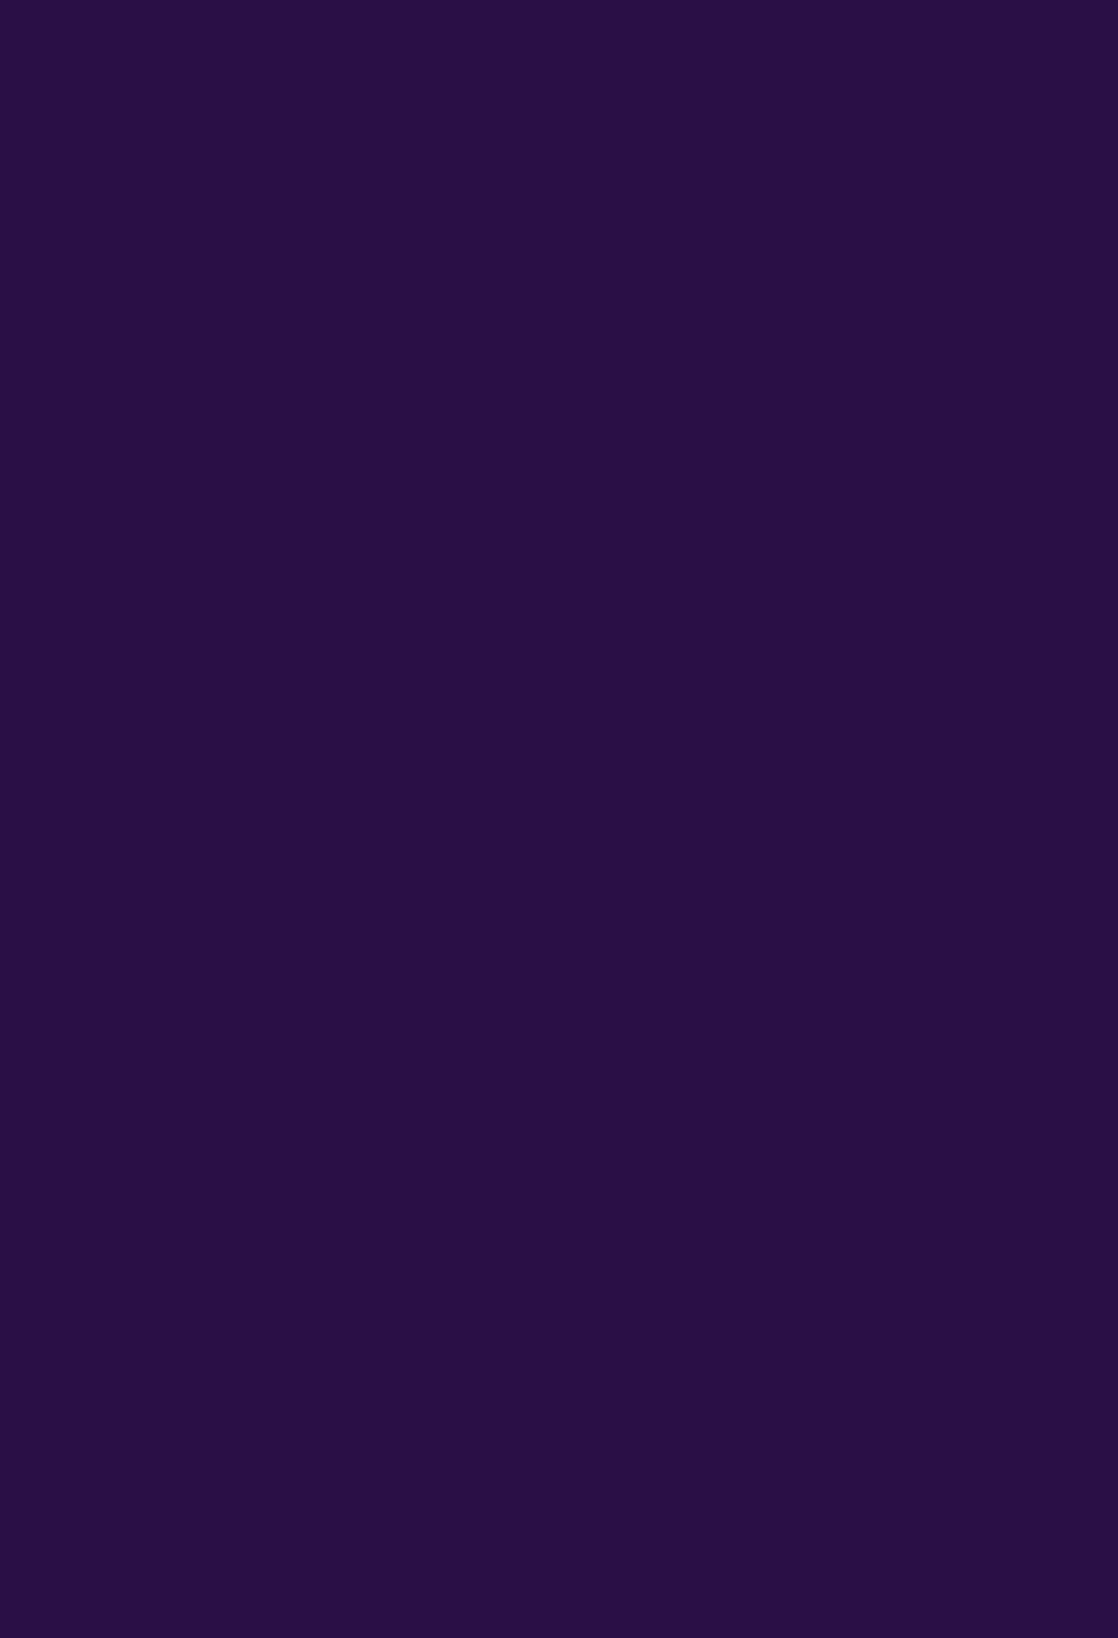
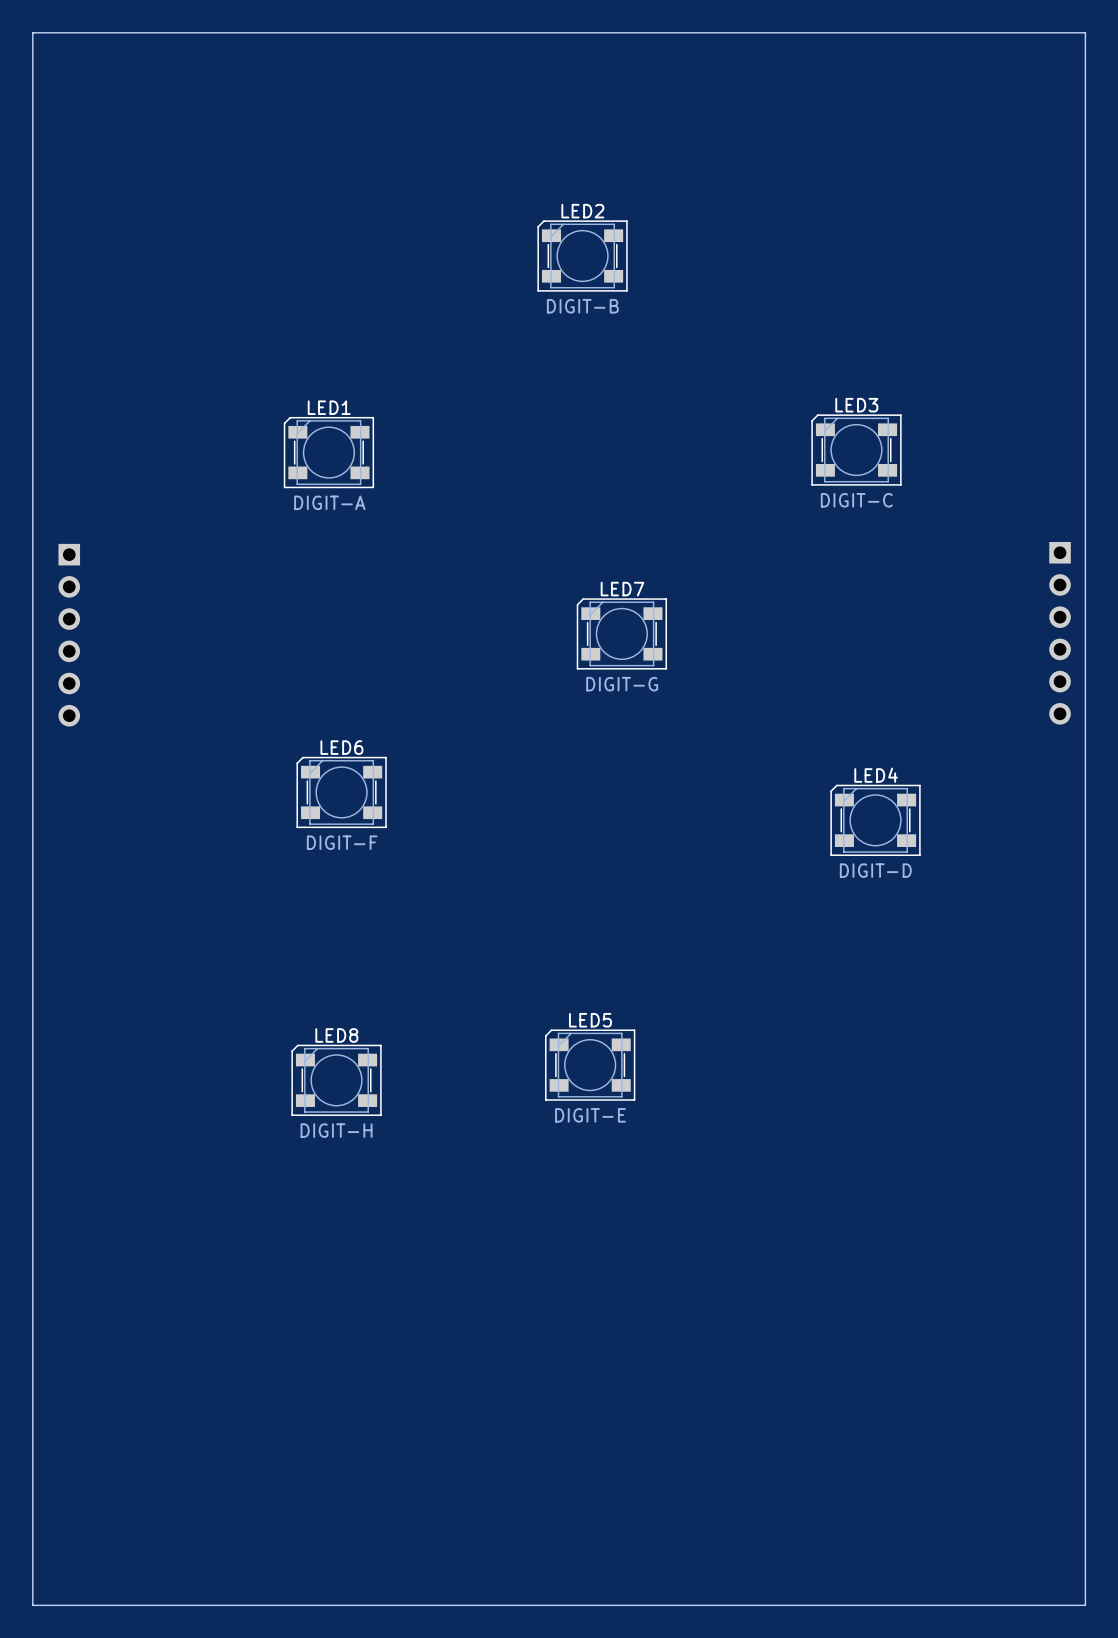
board edge: none -> (1085, 32) (32, 32) (32, 1605) (1085, 1605) (1085, 32)
LED2: none -> DIGIT-B (582, 256)
LED3: none -> DIGIT-C (856, 450)
LED1: none -> DIGIT-A (328, 452)
LED7: none -> DIGIT-G (621, 633)
part: none -> (1060, 633)
part: none -> (69, 635)
LED6: none -> DIGIT-F (341, 792)
LED4: none -> DIGIT-D (875, 820)
LED5: none -> DIGIT-E (590, 1065)
LED8: none -> DIGIT-H (336, 1080)

